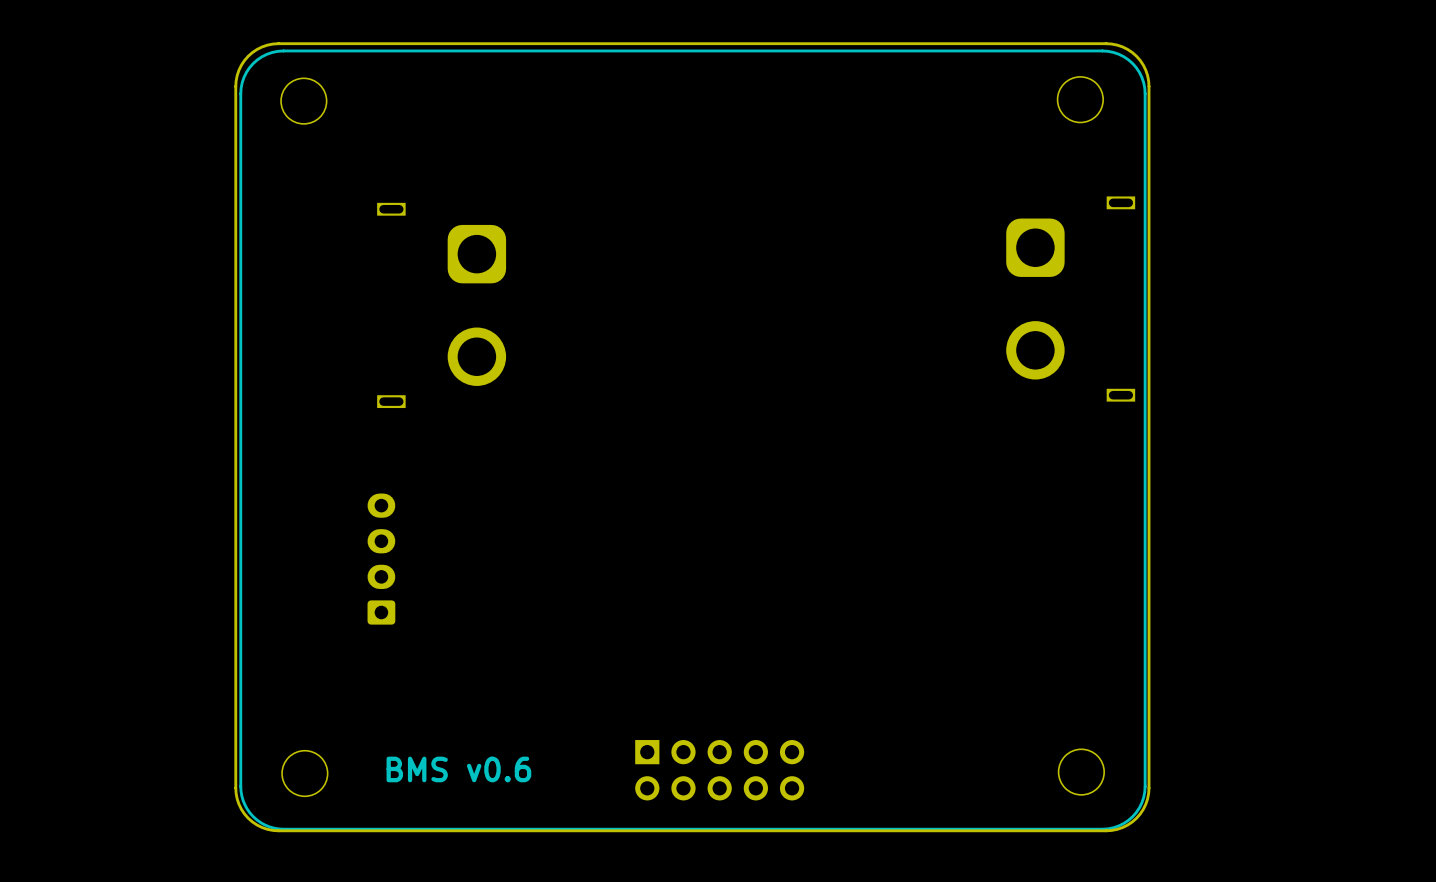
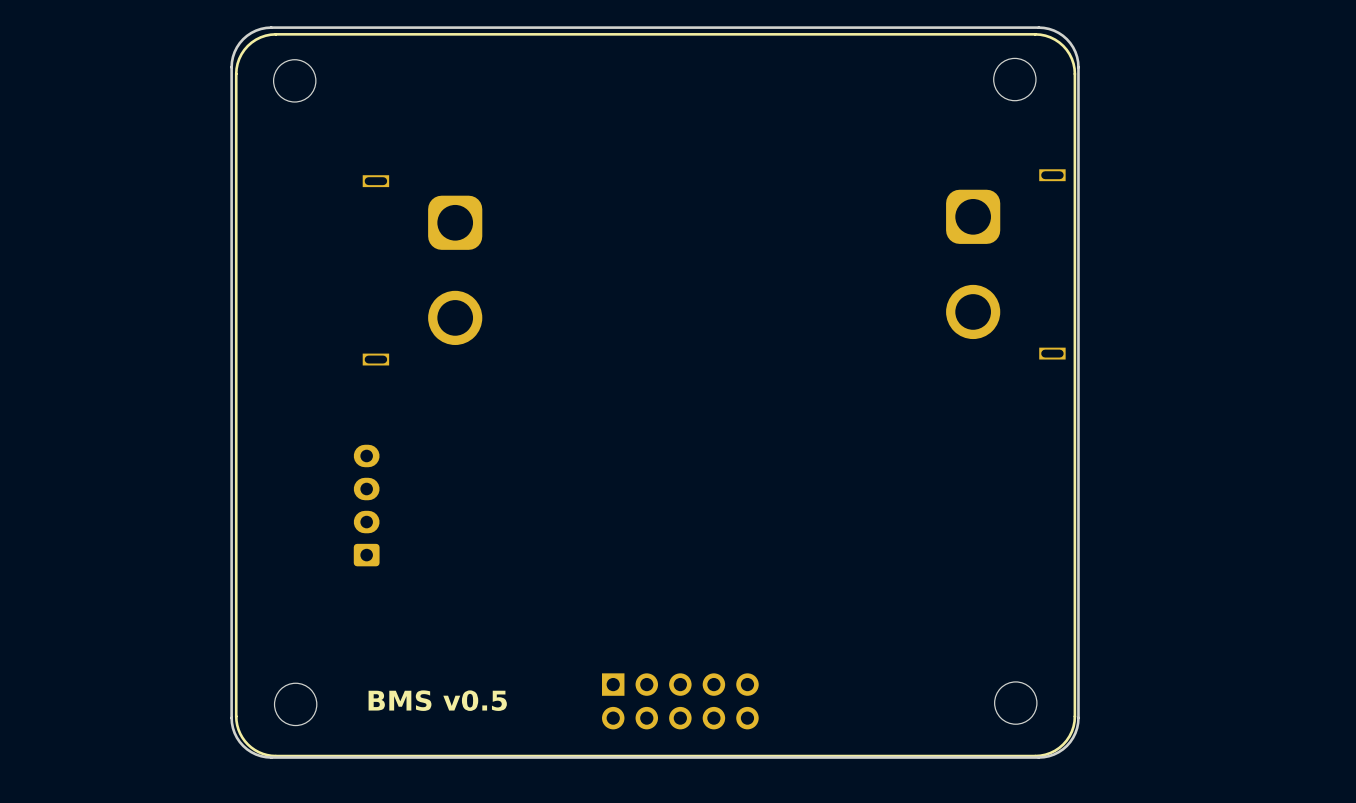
text: BMS v0.6 (458, 769) -> BMS v0.5 (437, 700)

